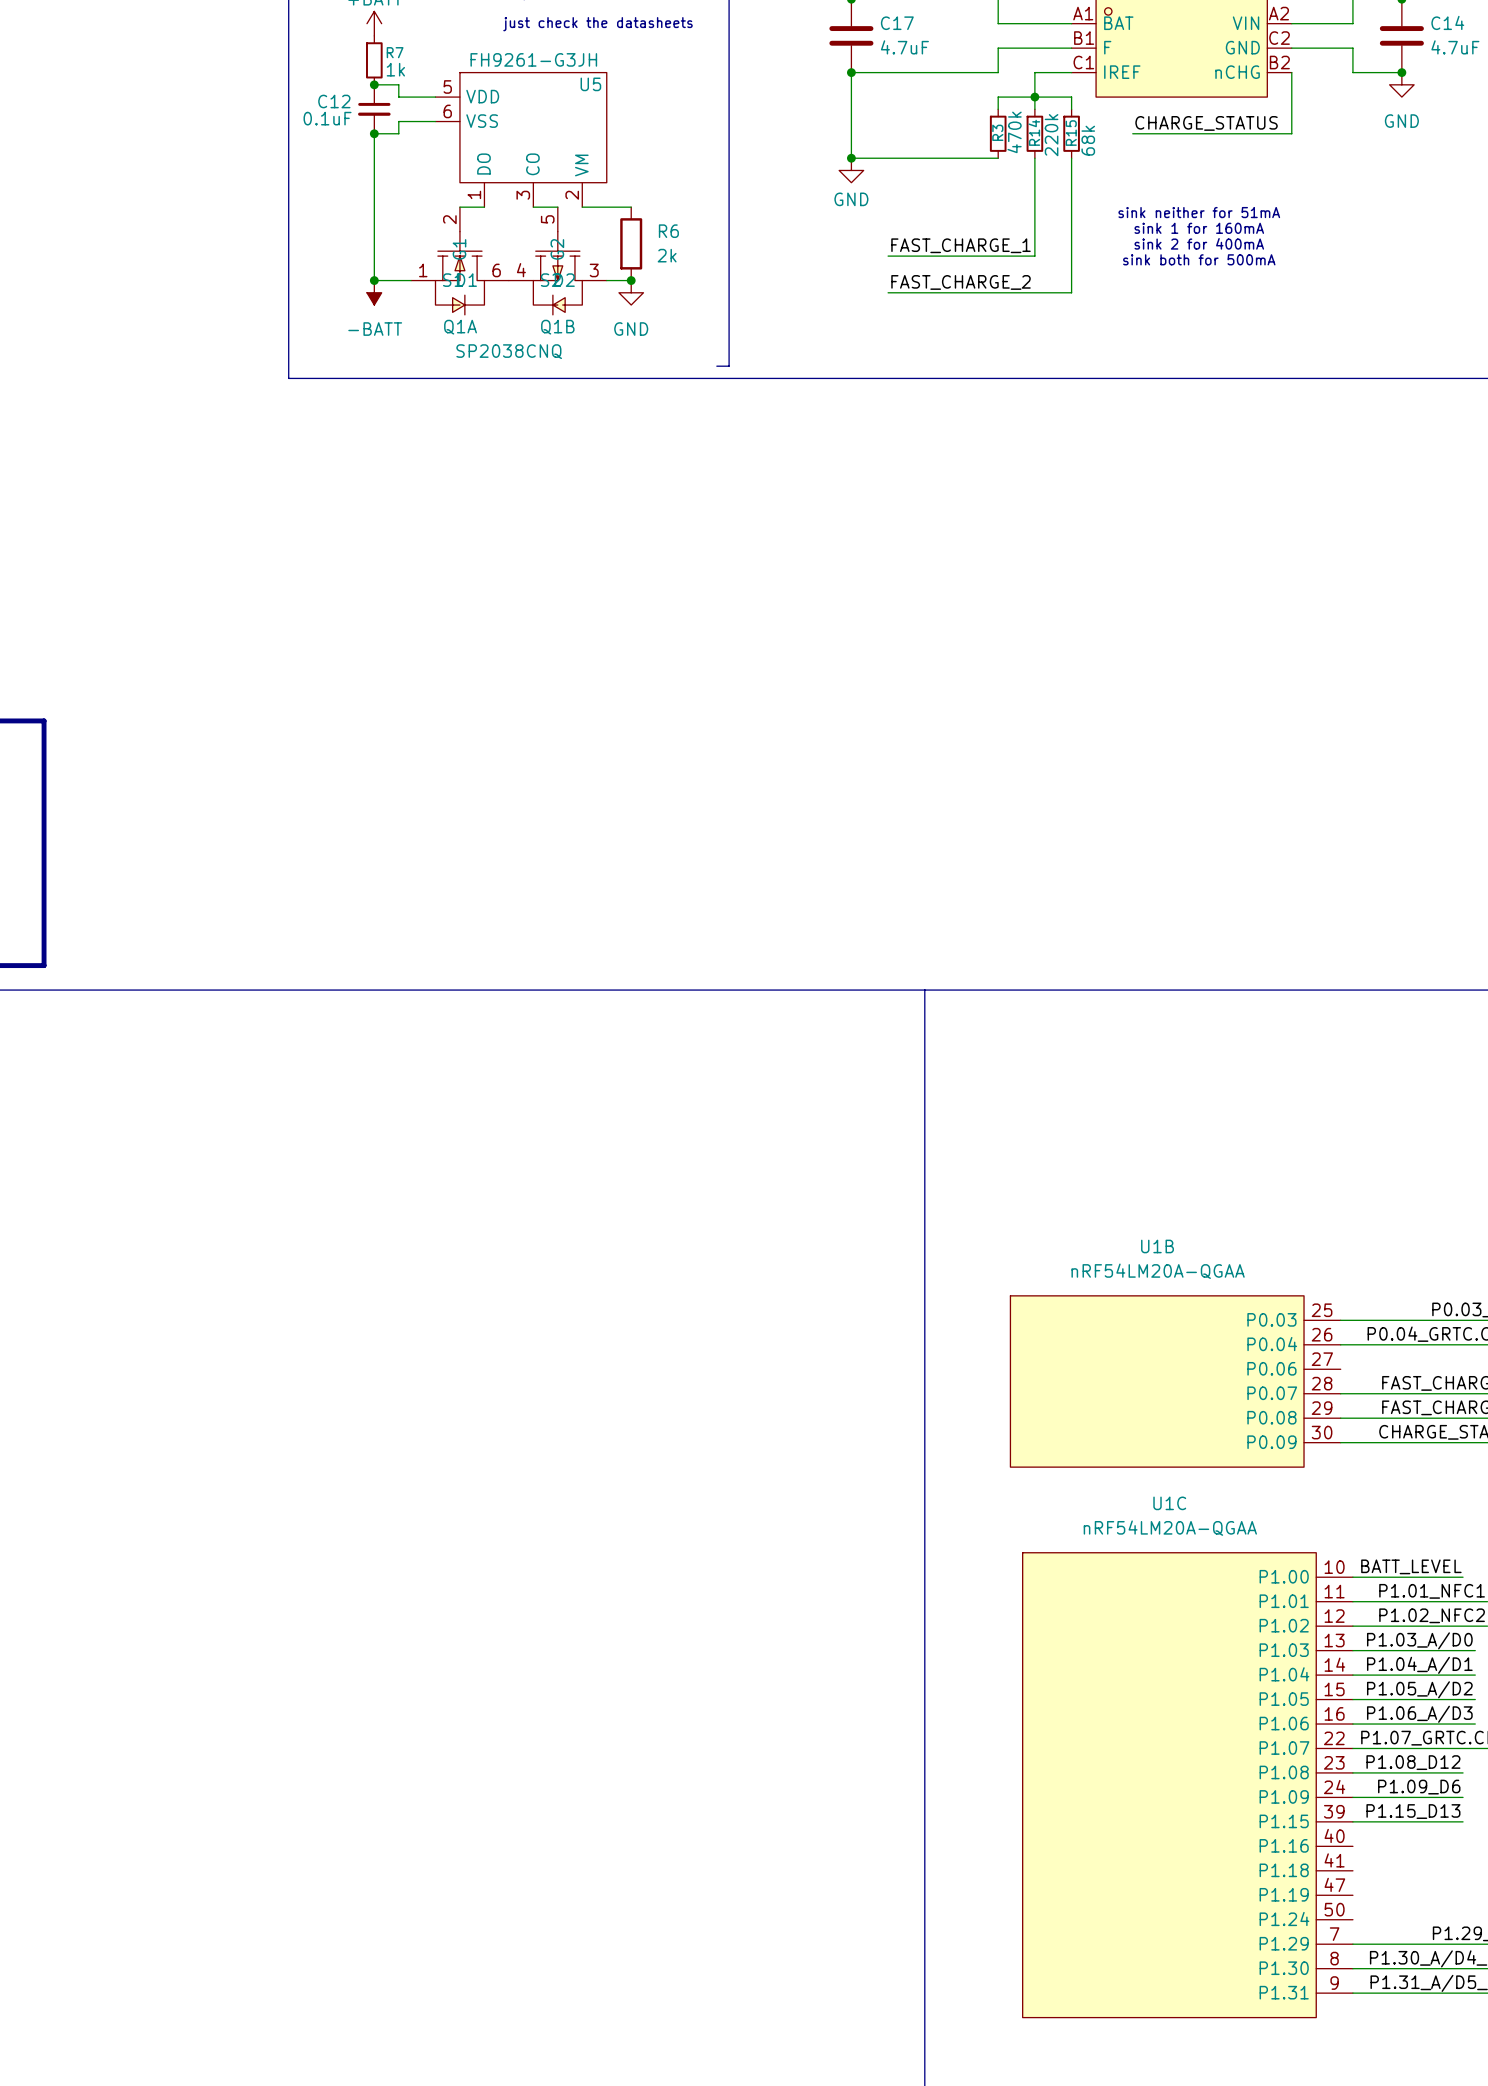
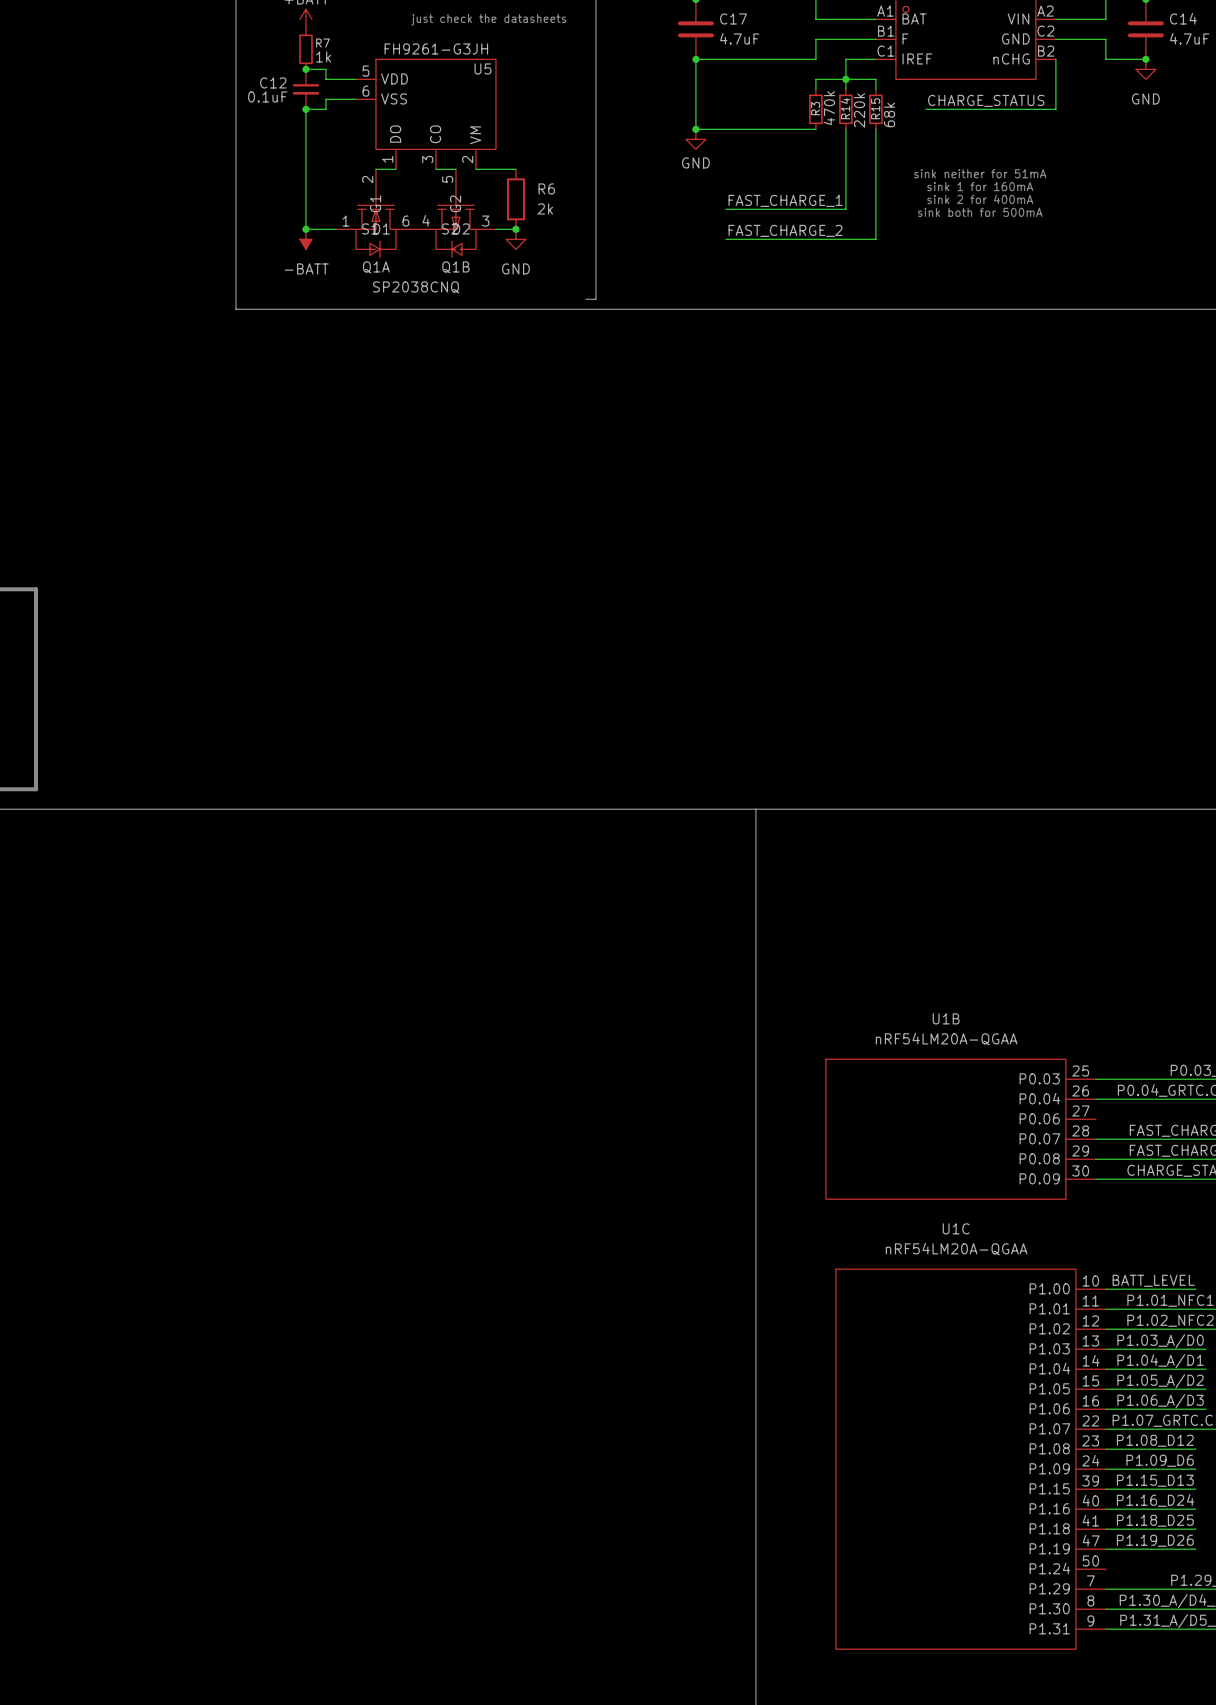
label: none -> P1.16_D24 (1155, 1500)
wire: none -> (1105, 1509) (1195, 1509)
label: none -> P1.18_D25 (1155, 1520)
wire: none -> (1105, 1529) (1195, 1529)
label: none -> P1.19_D26 (1155, 1540)
wire: none -> (1105, 1549) (1195, 1549)

